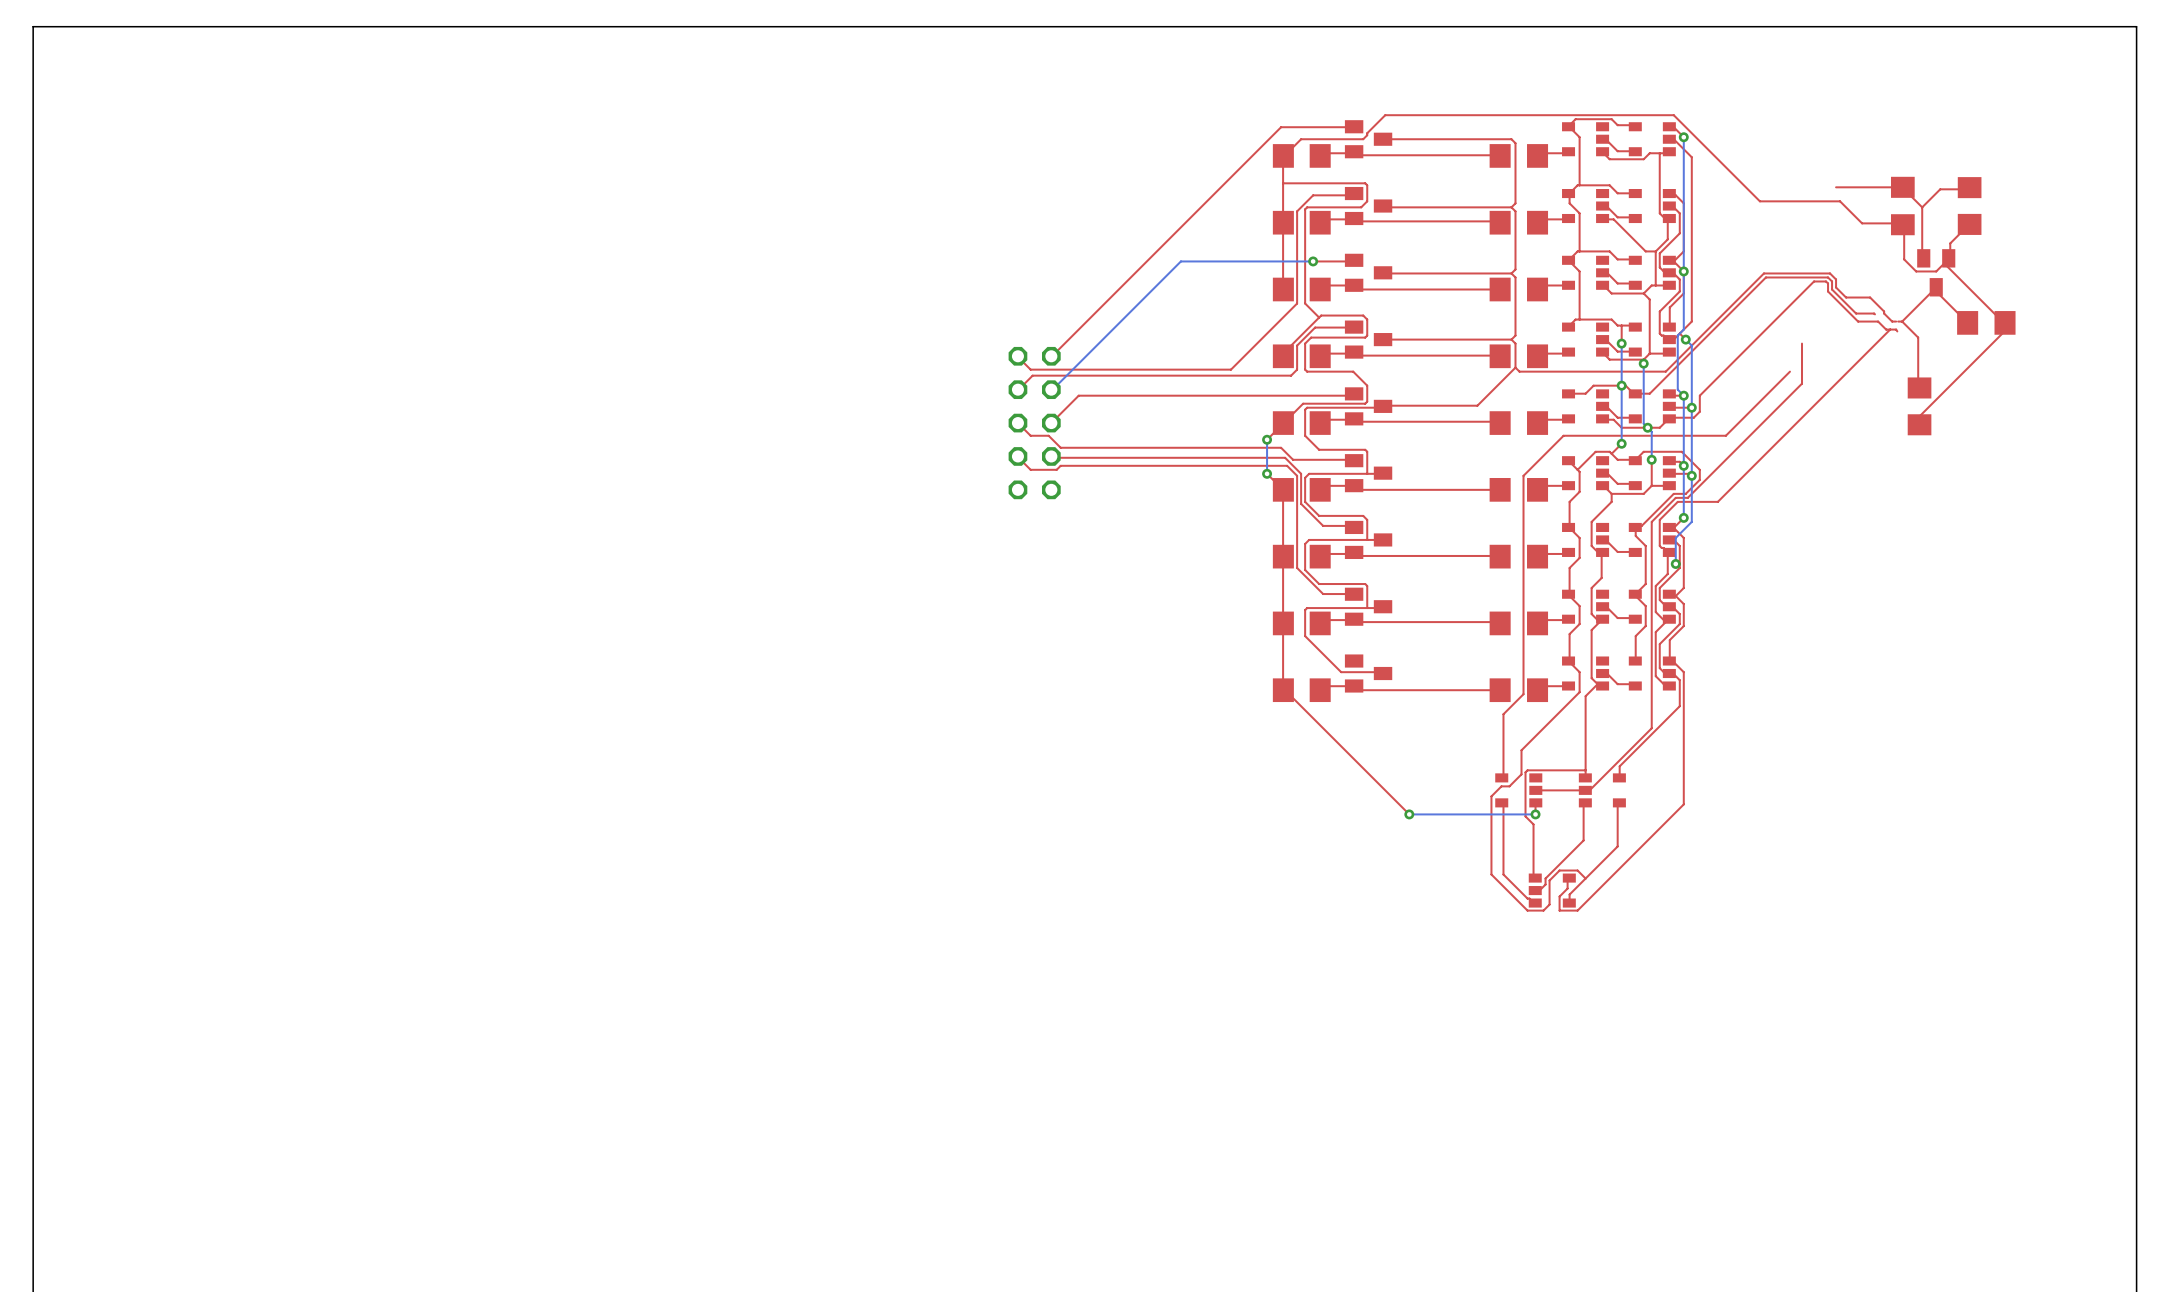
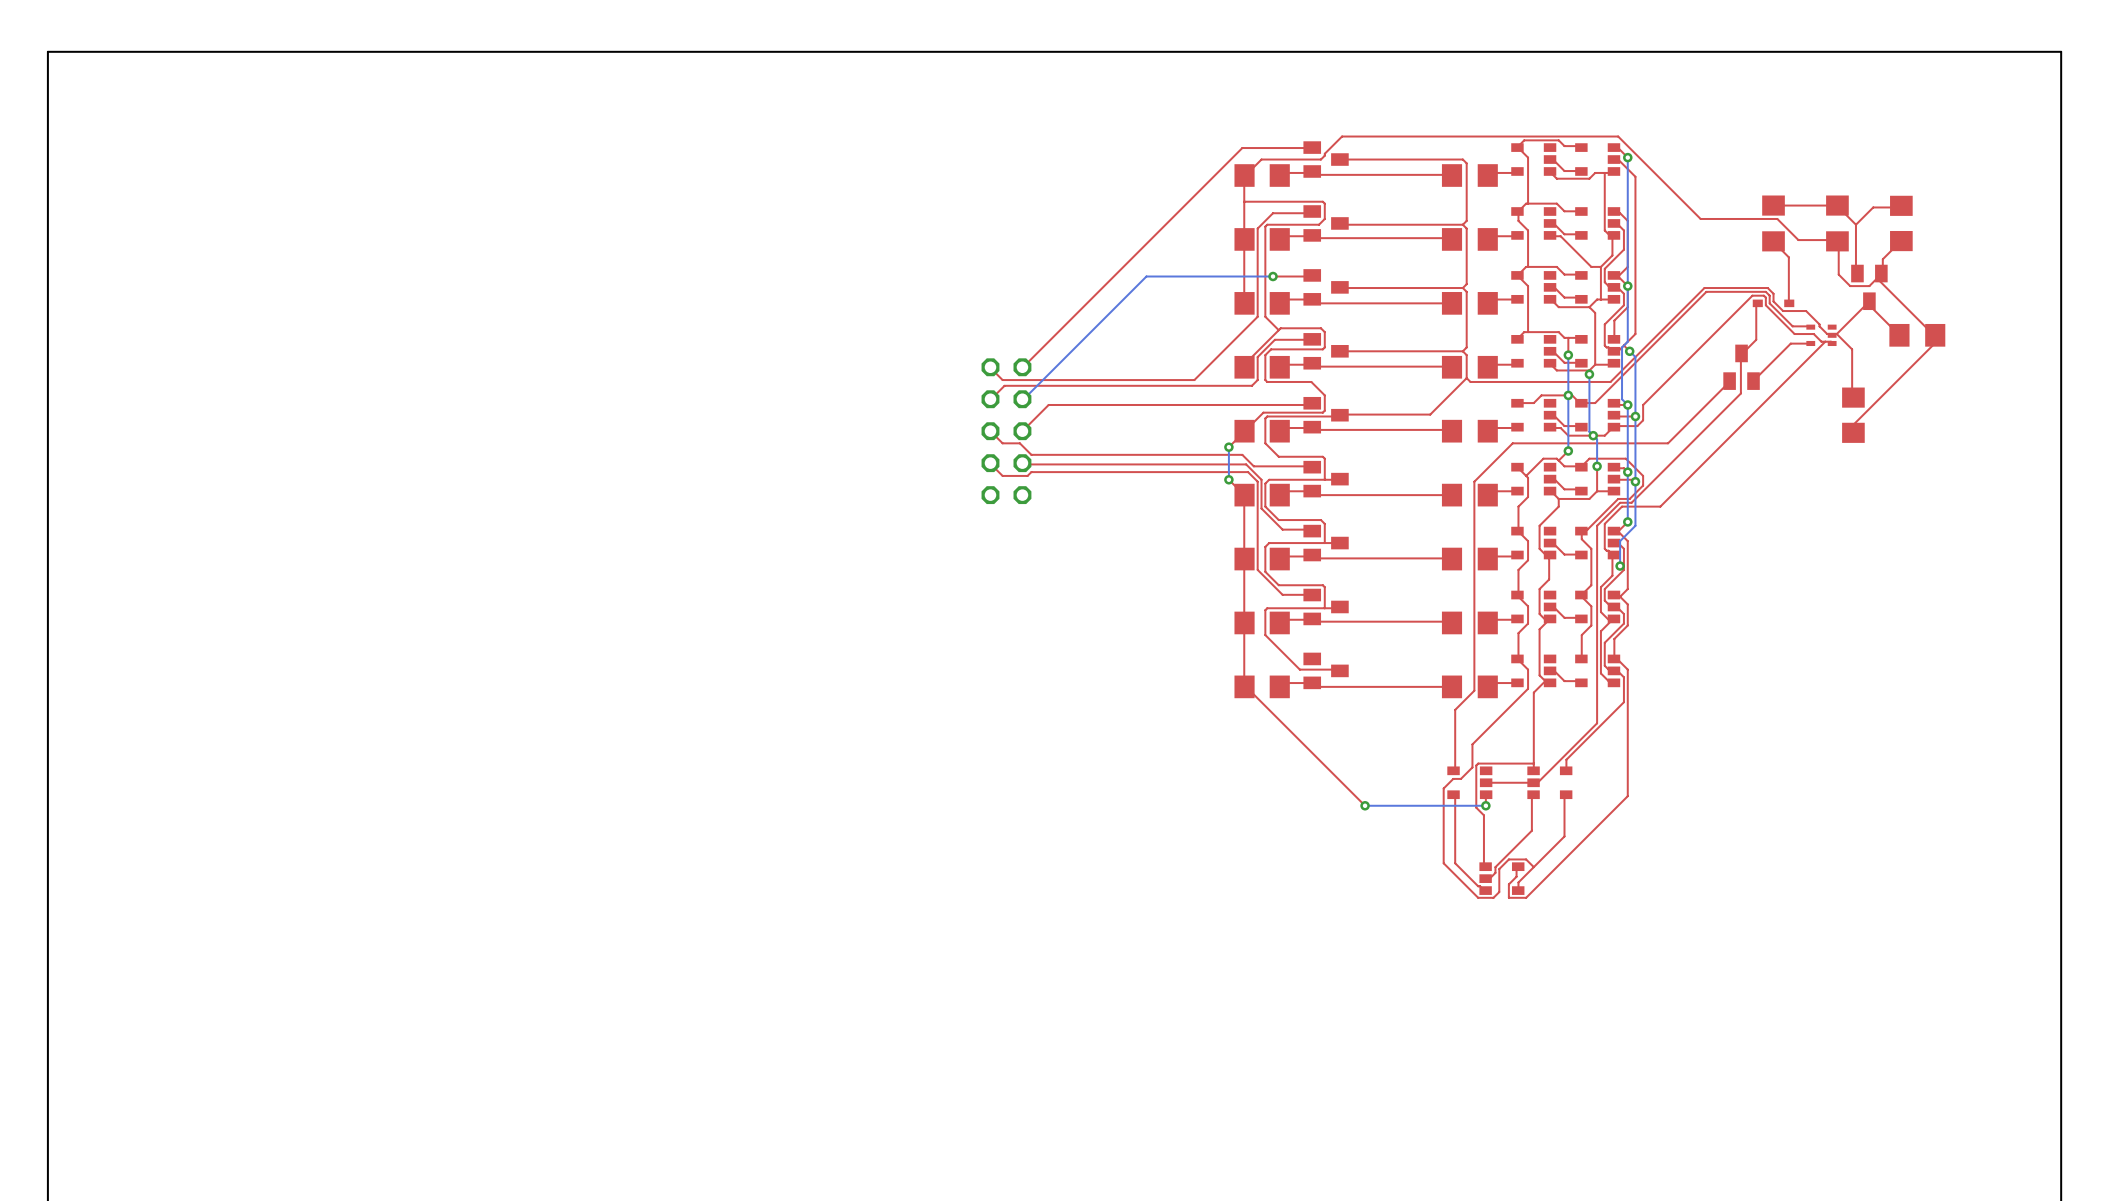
part: none -> (1773, 223)
top track: none -> (1773, 241) (1788, 257) (1789, 303)
top track: none -> (1757, 303) (1756, 303) (1756, 339) (1740, 355)
part: none -> (1773, 303)
part: none -> (1821, 335)
top track: none -> (1810, 343) (1790, 343) (1753, 381)
part: none -> (1741, 367)

